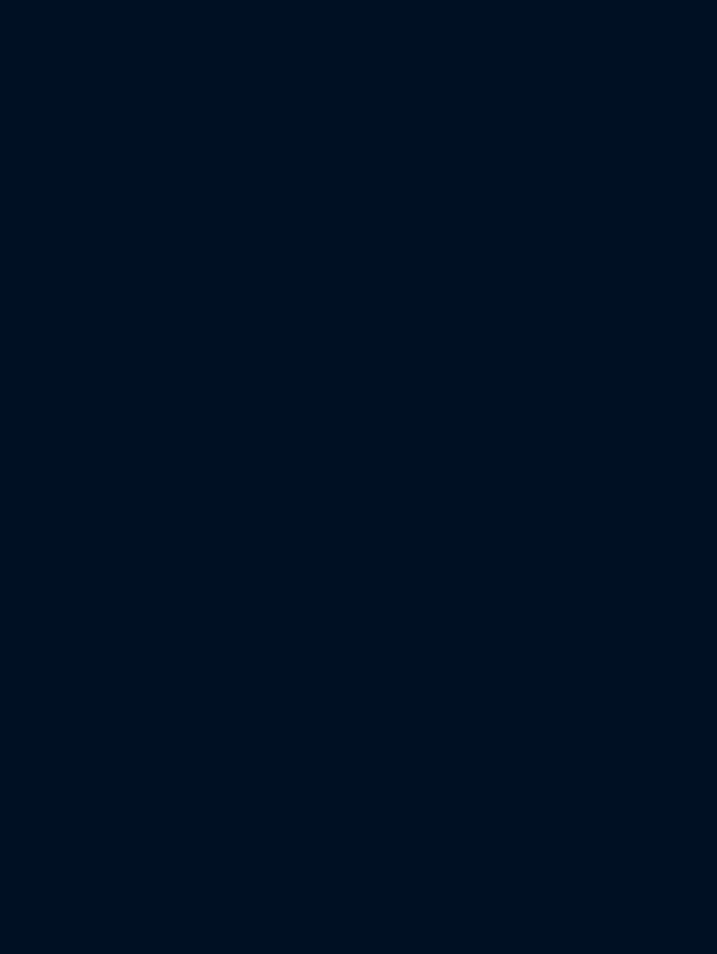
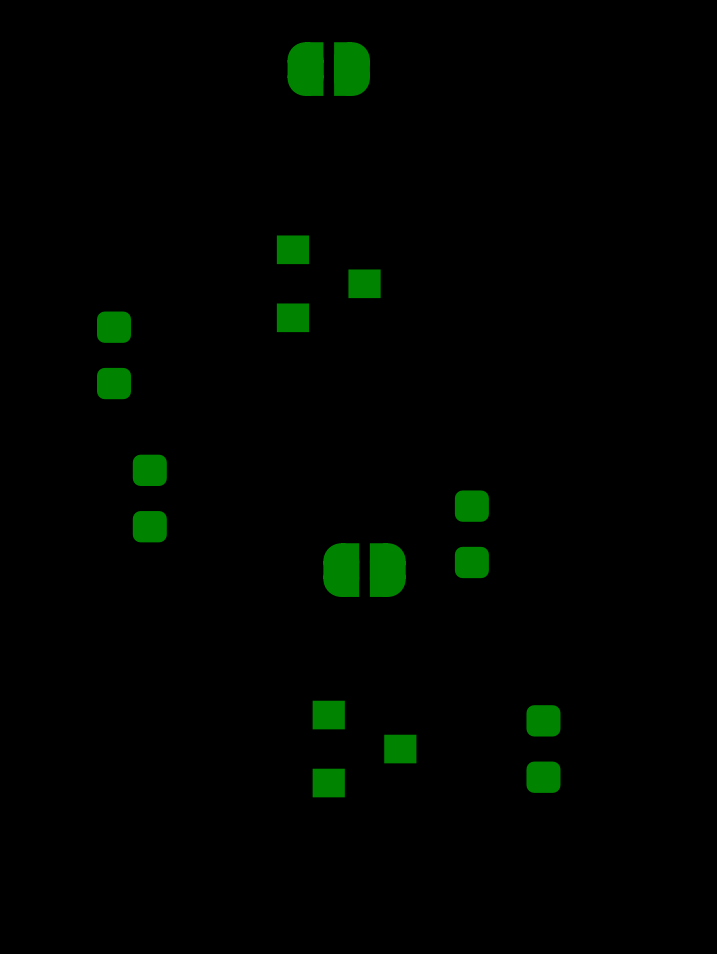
part: none -> (328, 69)
part: none -> (328, 283)
part: none -> (114, 355)
part: none -> (149, 498)
part: none -> (471, 534)
part: none -> (364, 570)
part: none -> (364, 749)
part: none -> (543, 749)

